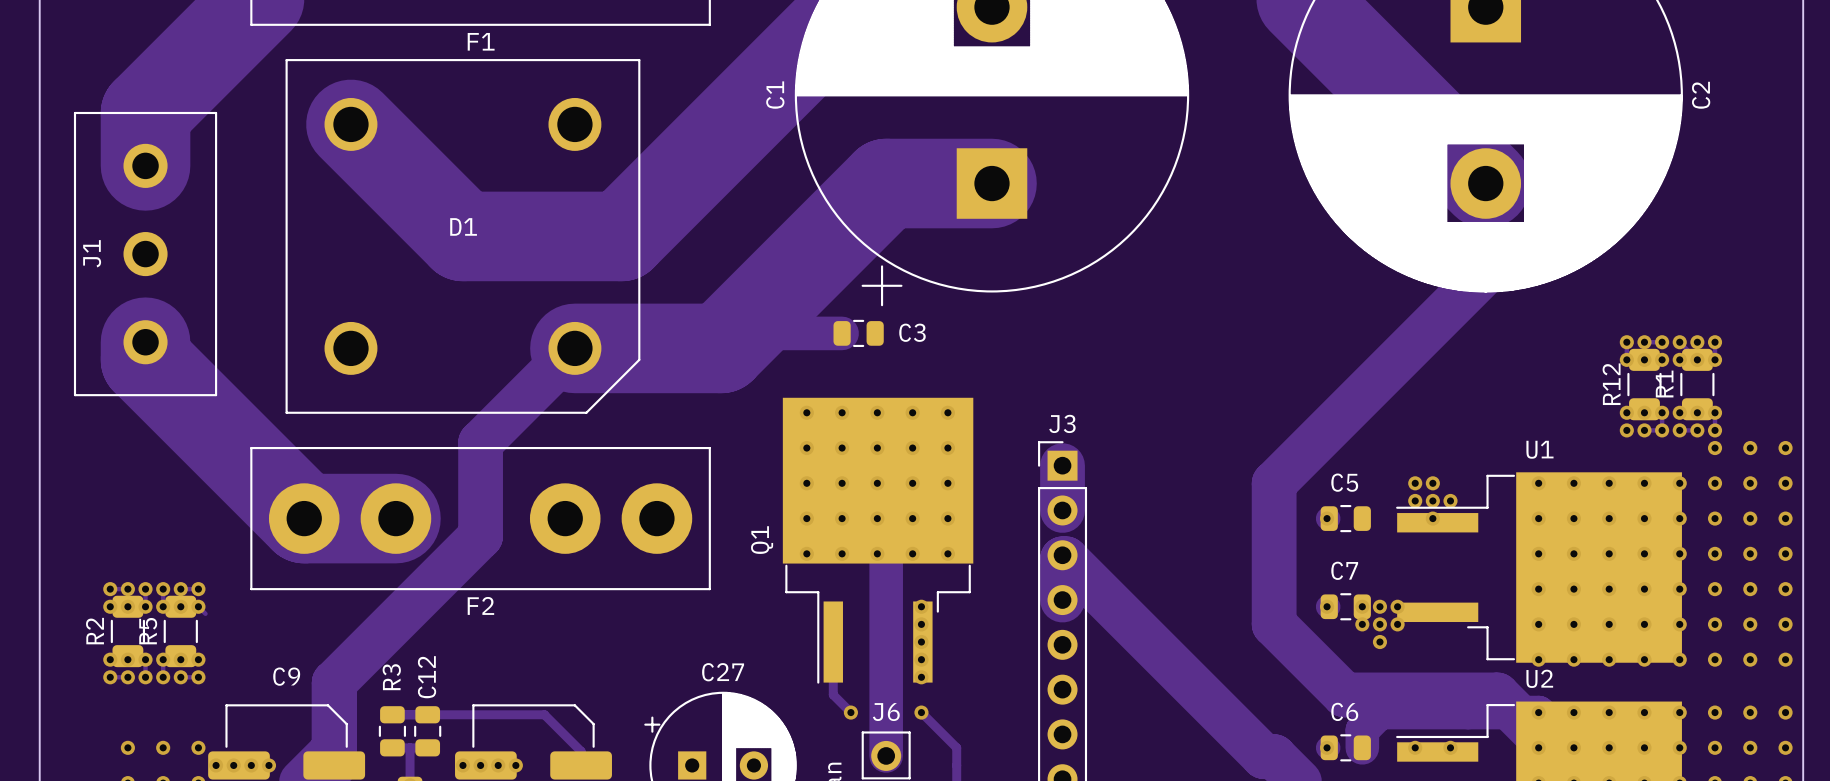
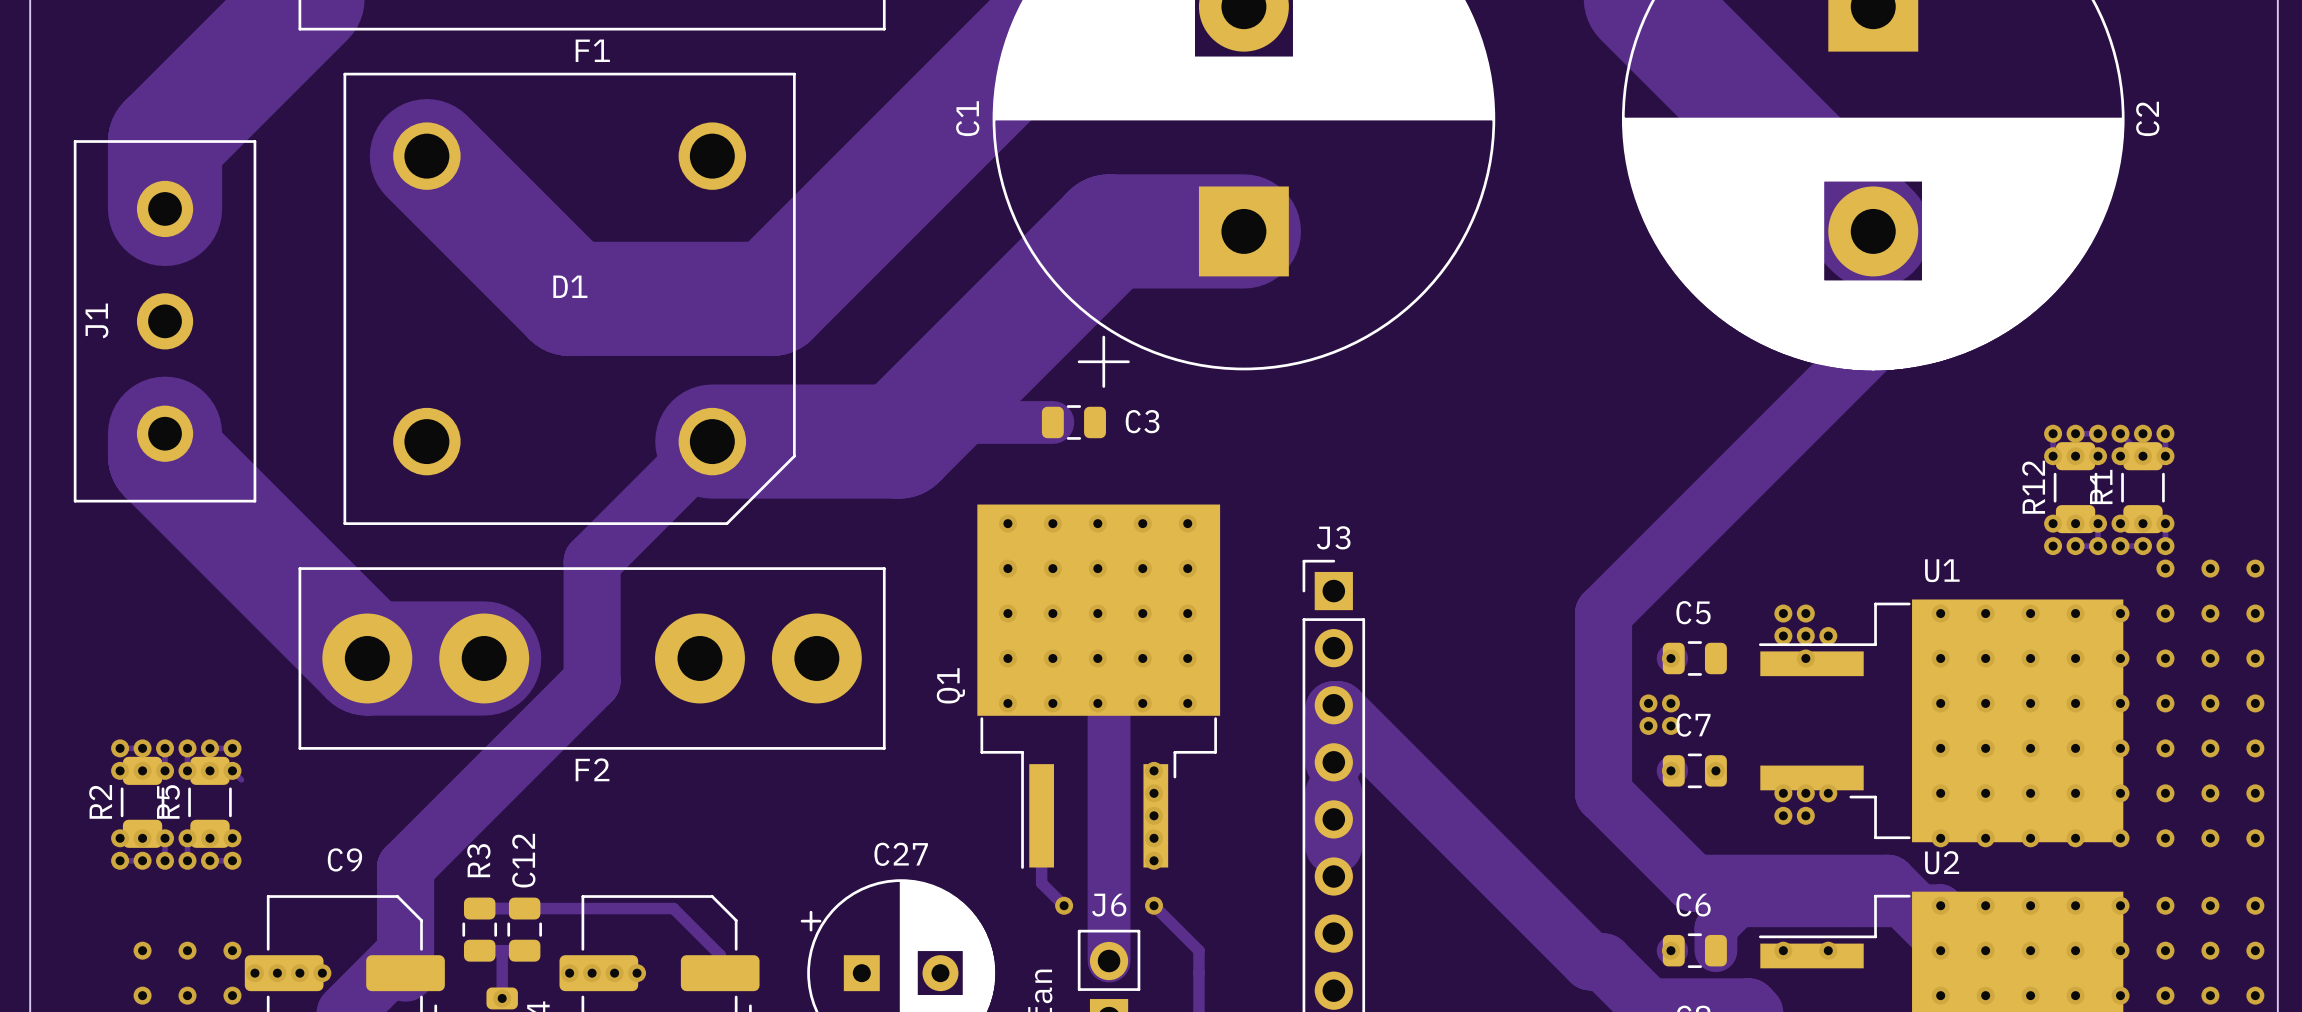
track: (1062, 465) (1062, 510) -> none
via: none -> (1648, 703)
via: none -> (1670, 703)
via: none -> (1648, 725)
via: none -> (1670, 725)
via: (1379, 606) -> none
via: (1397, 606) -> none
via: (1362, 624) -> none
via: (1379, 624) -> none
via: (1397, 624) -> none
via: none -> (1783, 793)
via: none -> (1805, 793)
via: none -> (1828, 793)
via: (1379, 642) -> none
via: none -> (1783, 815)
via: none -> (1805, 815)
track: none -> (1333, 845) (1333, 793) (1333, 850)

